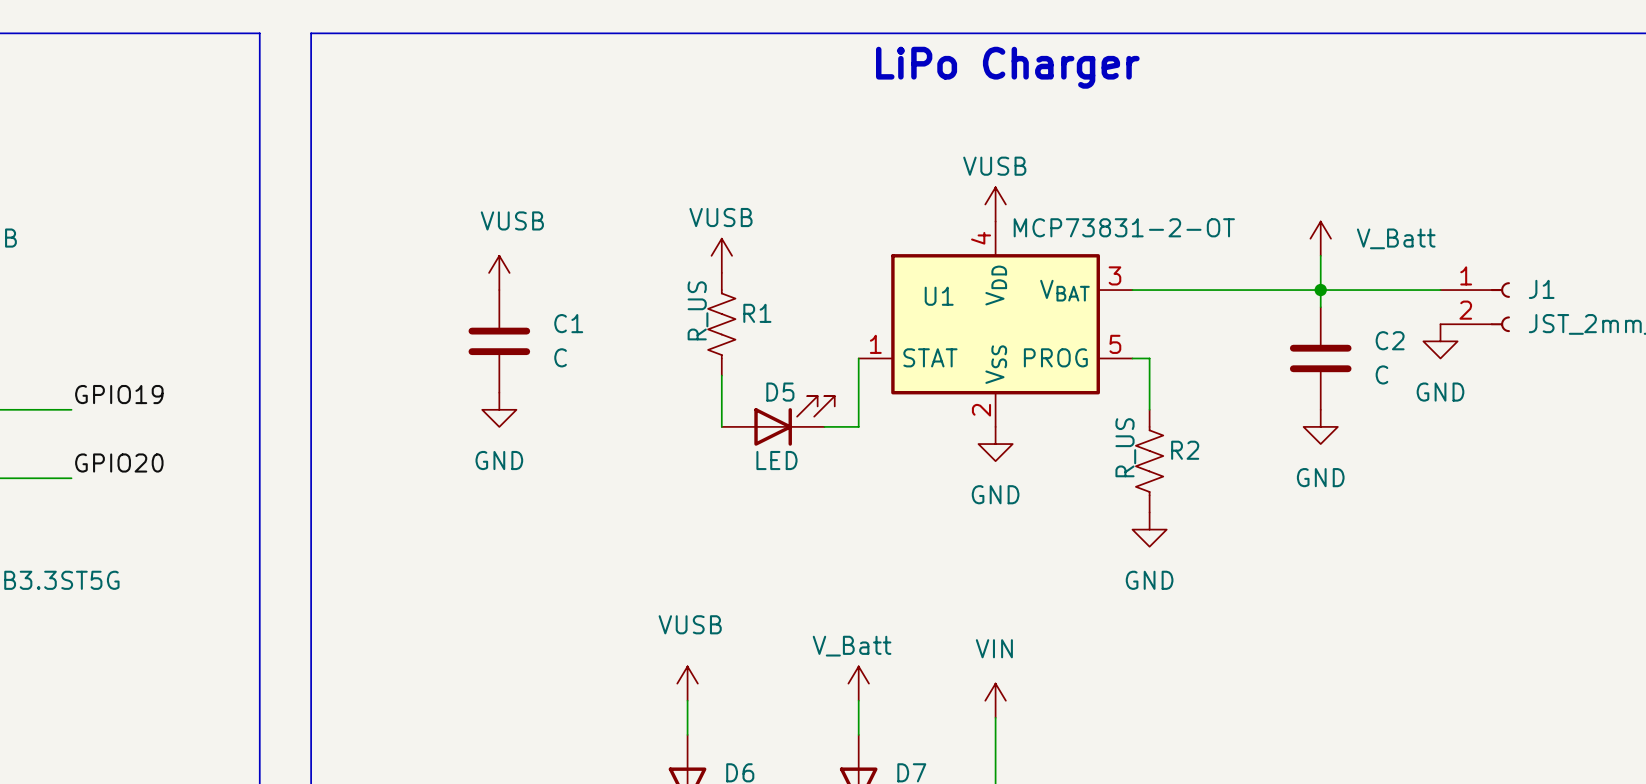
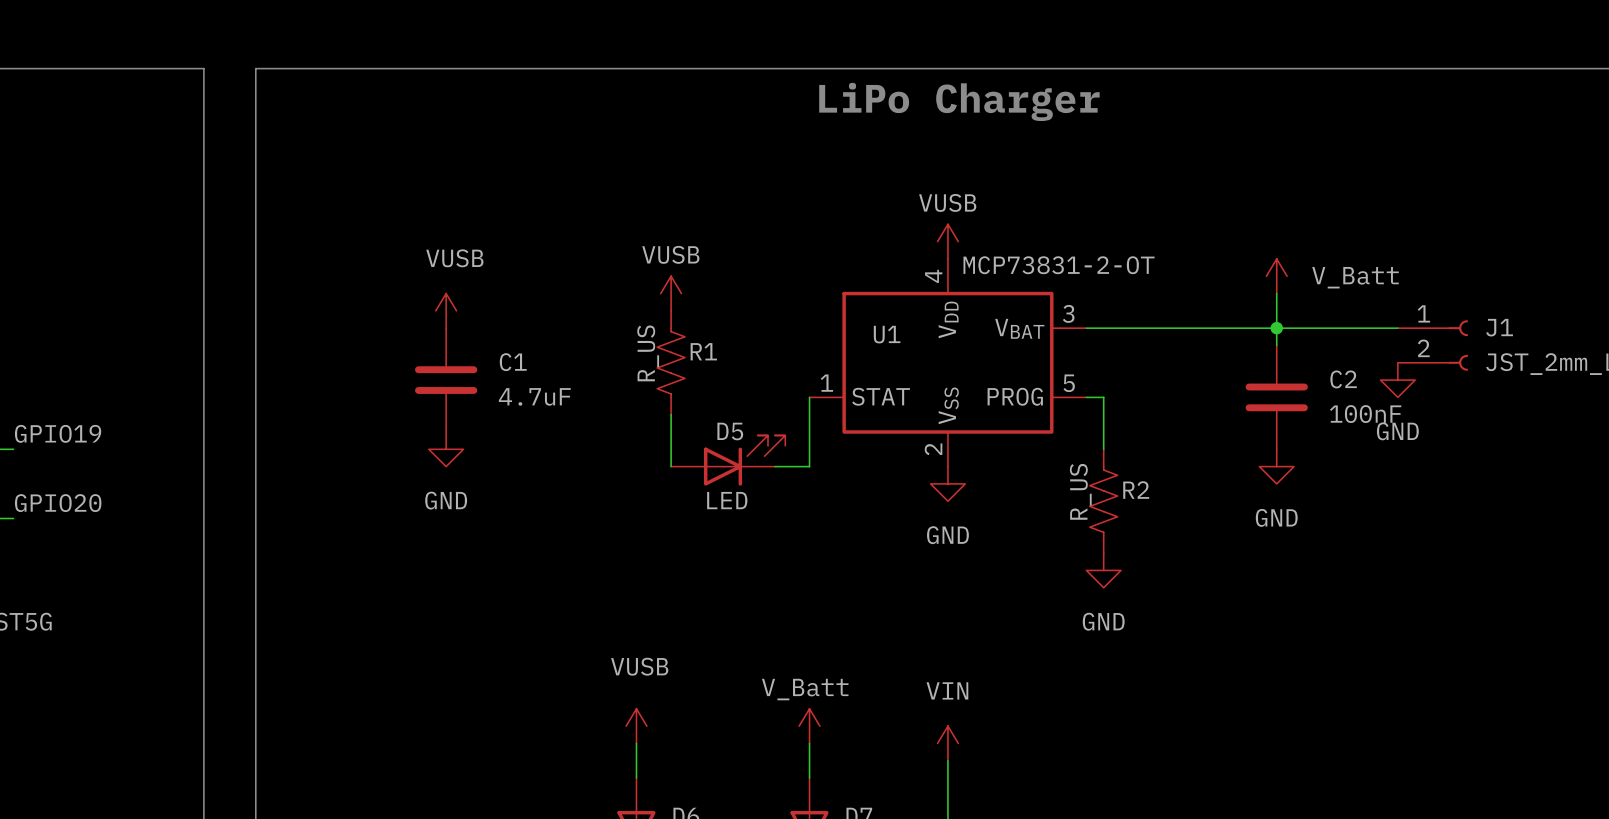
C1 value: C (560, 357) -> 4.7uF (534, 396)
C2 value: C (1381, 374) -> 100nF (1365, 414)

